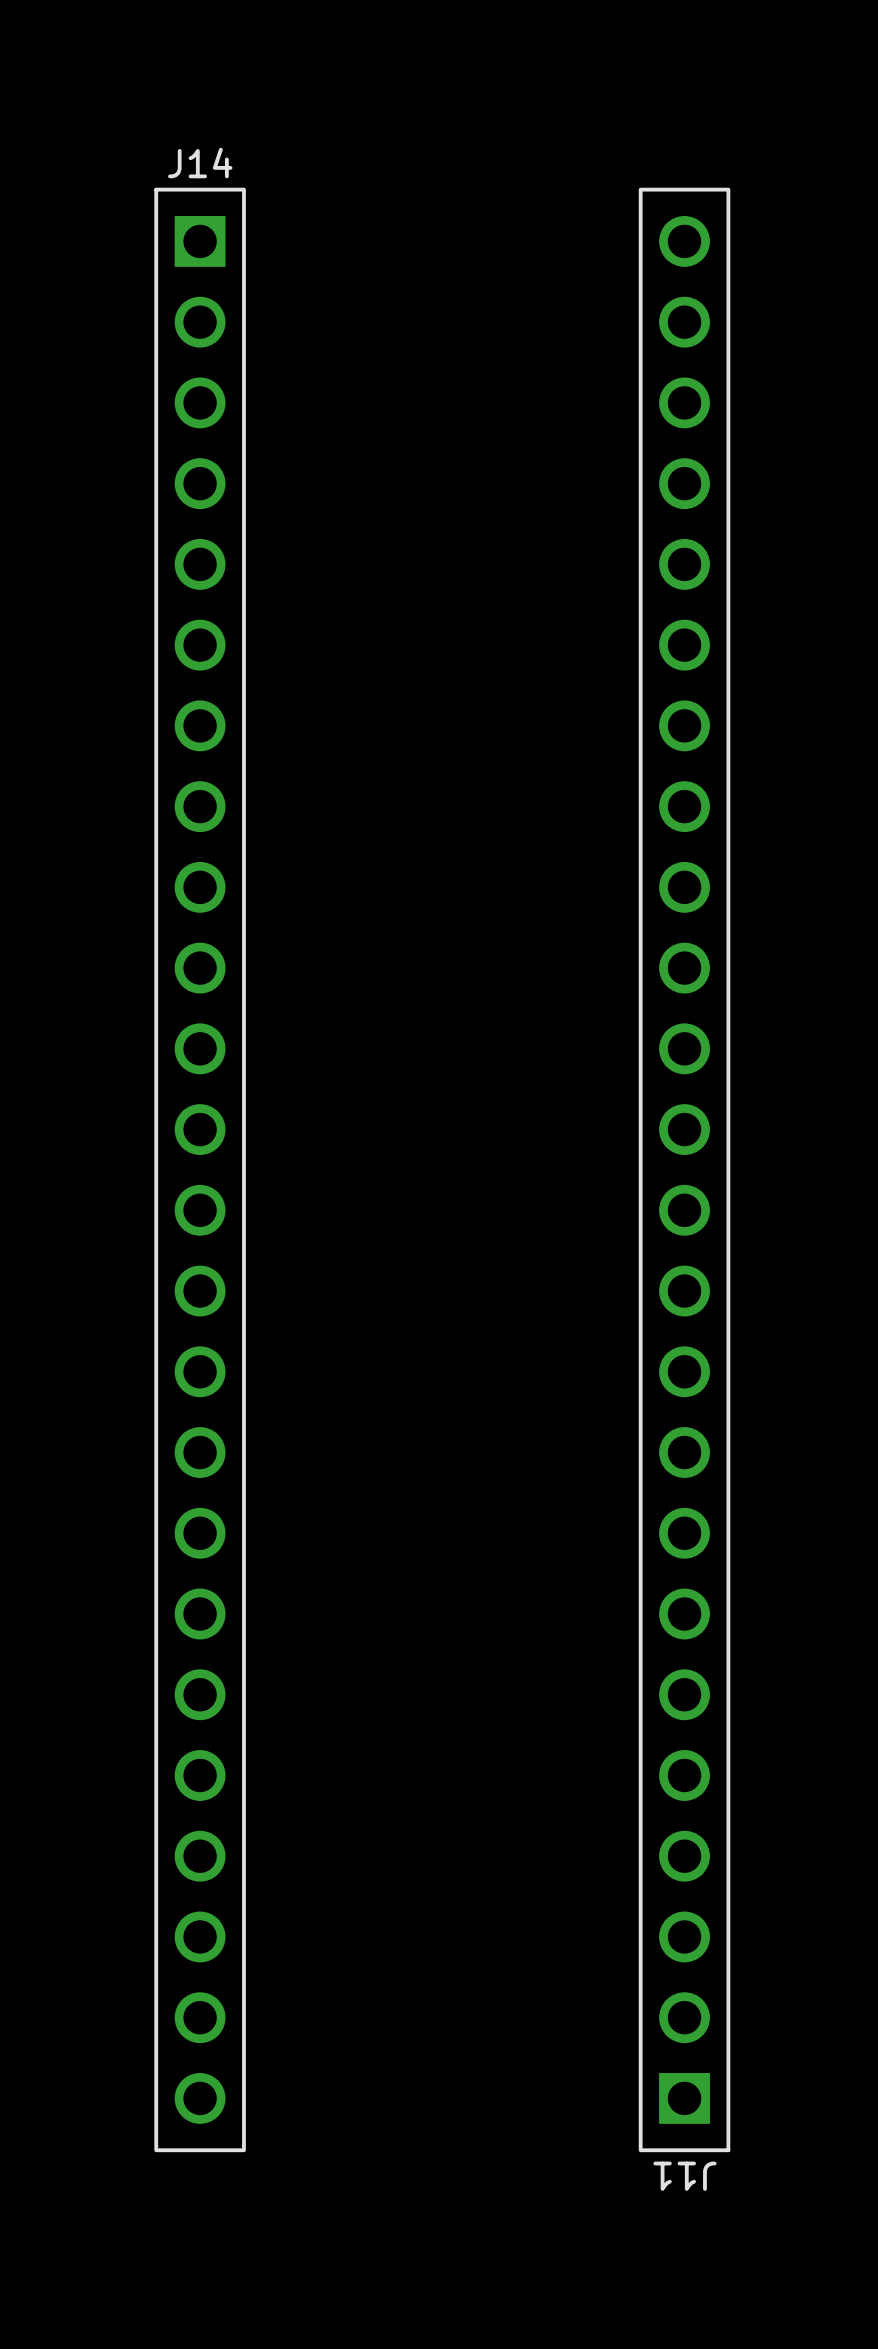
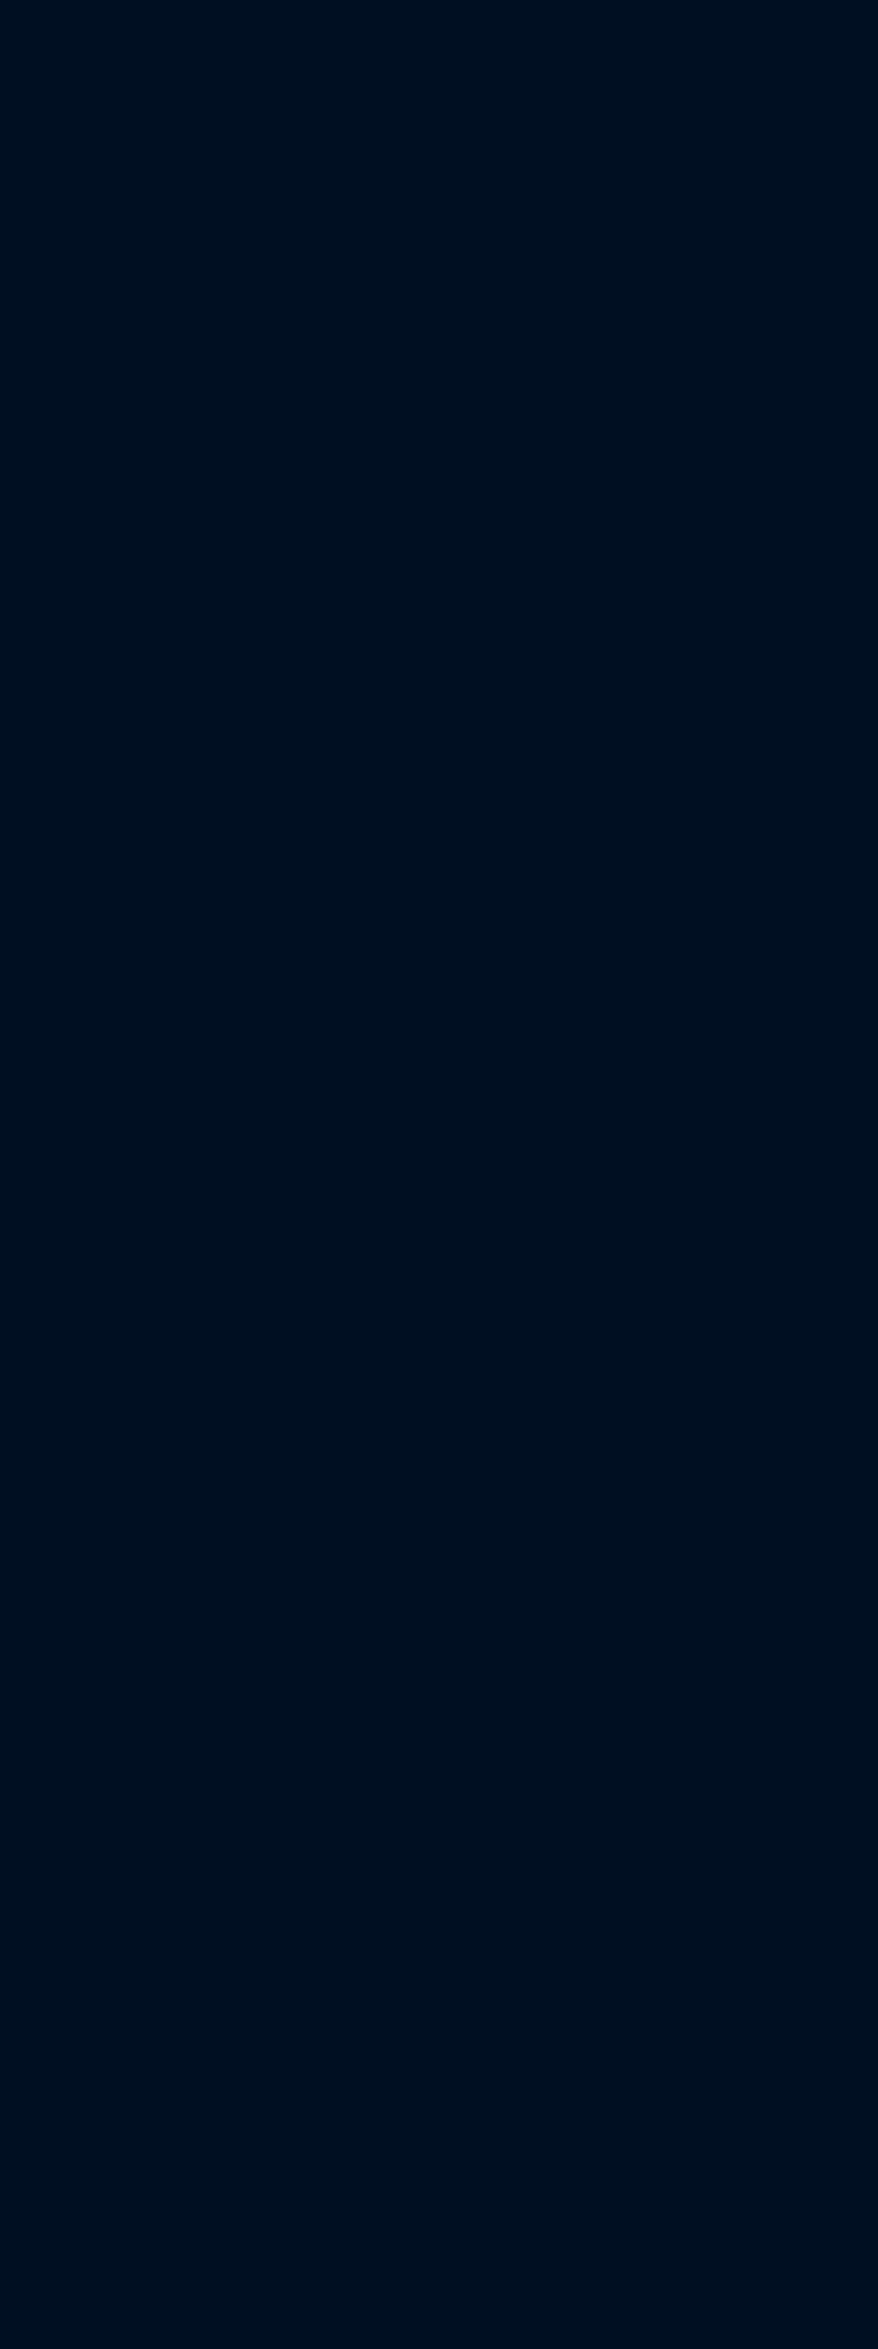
J14: (200, 1169) -> none
J11: (684, 1169) -> none

